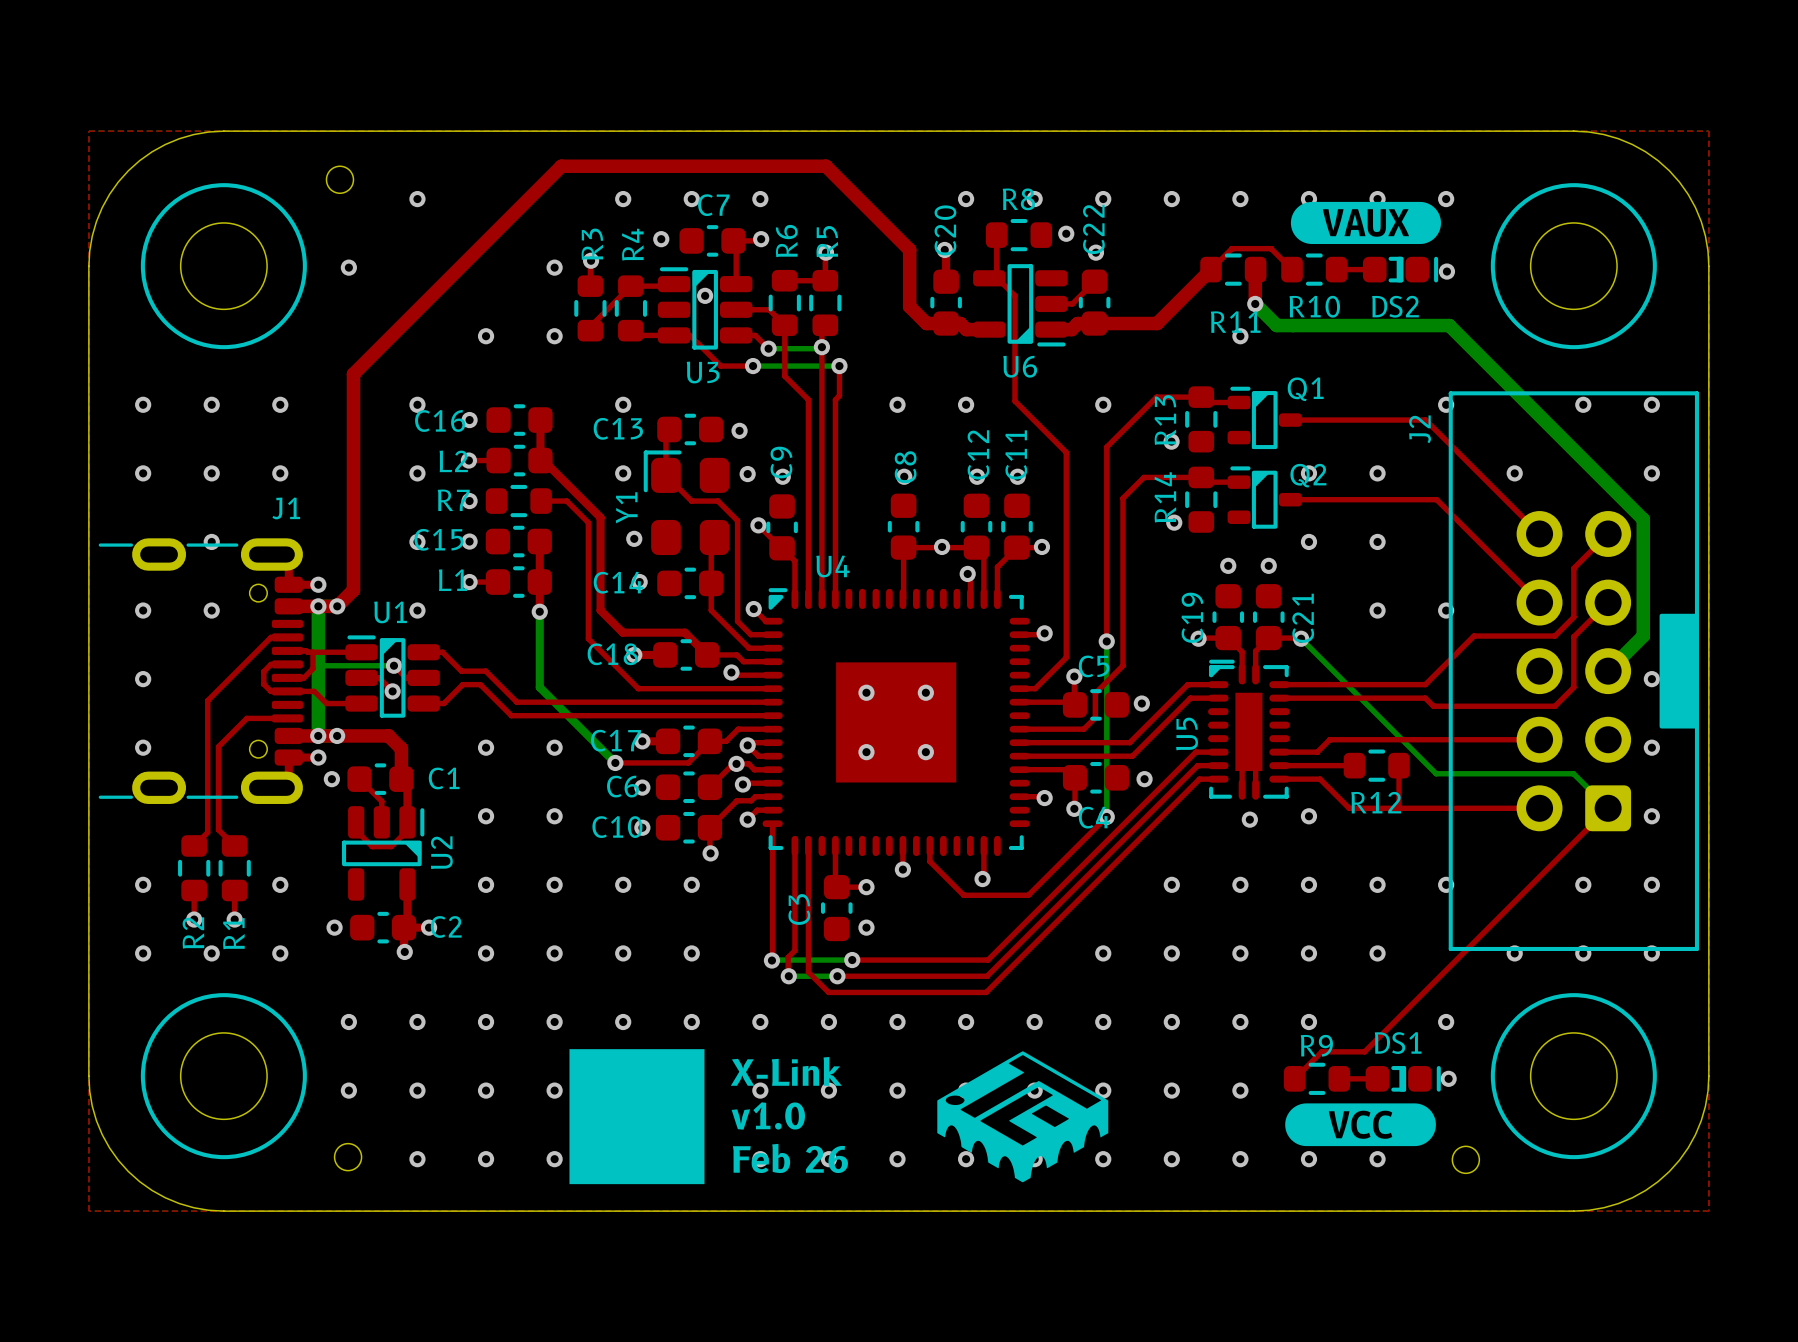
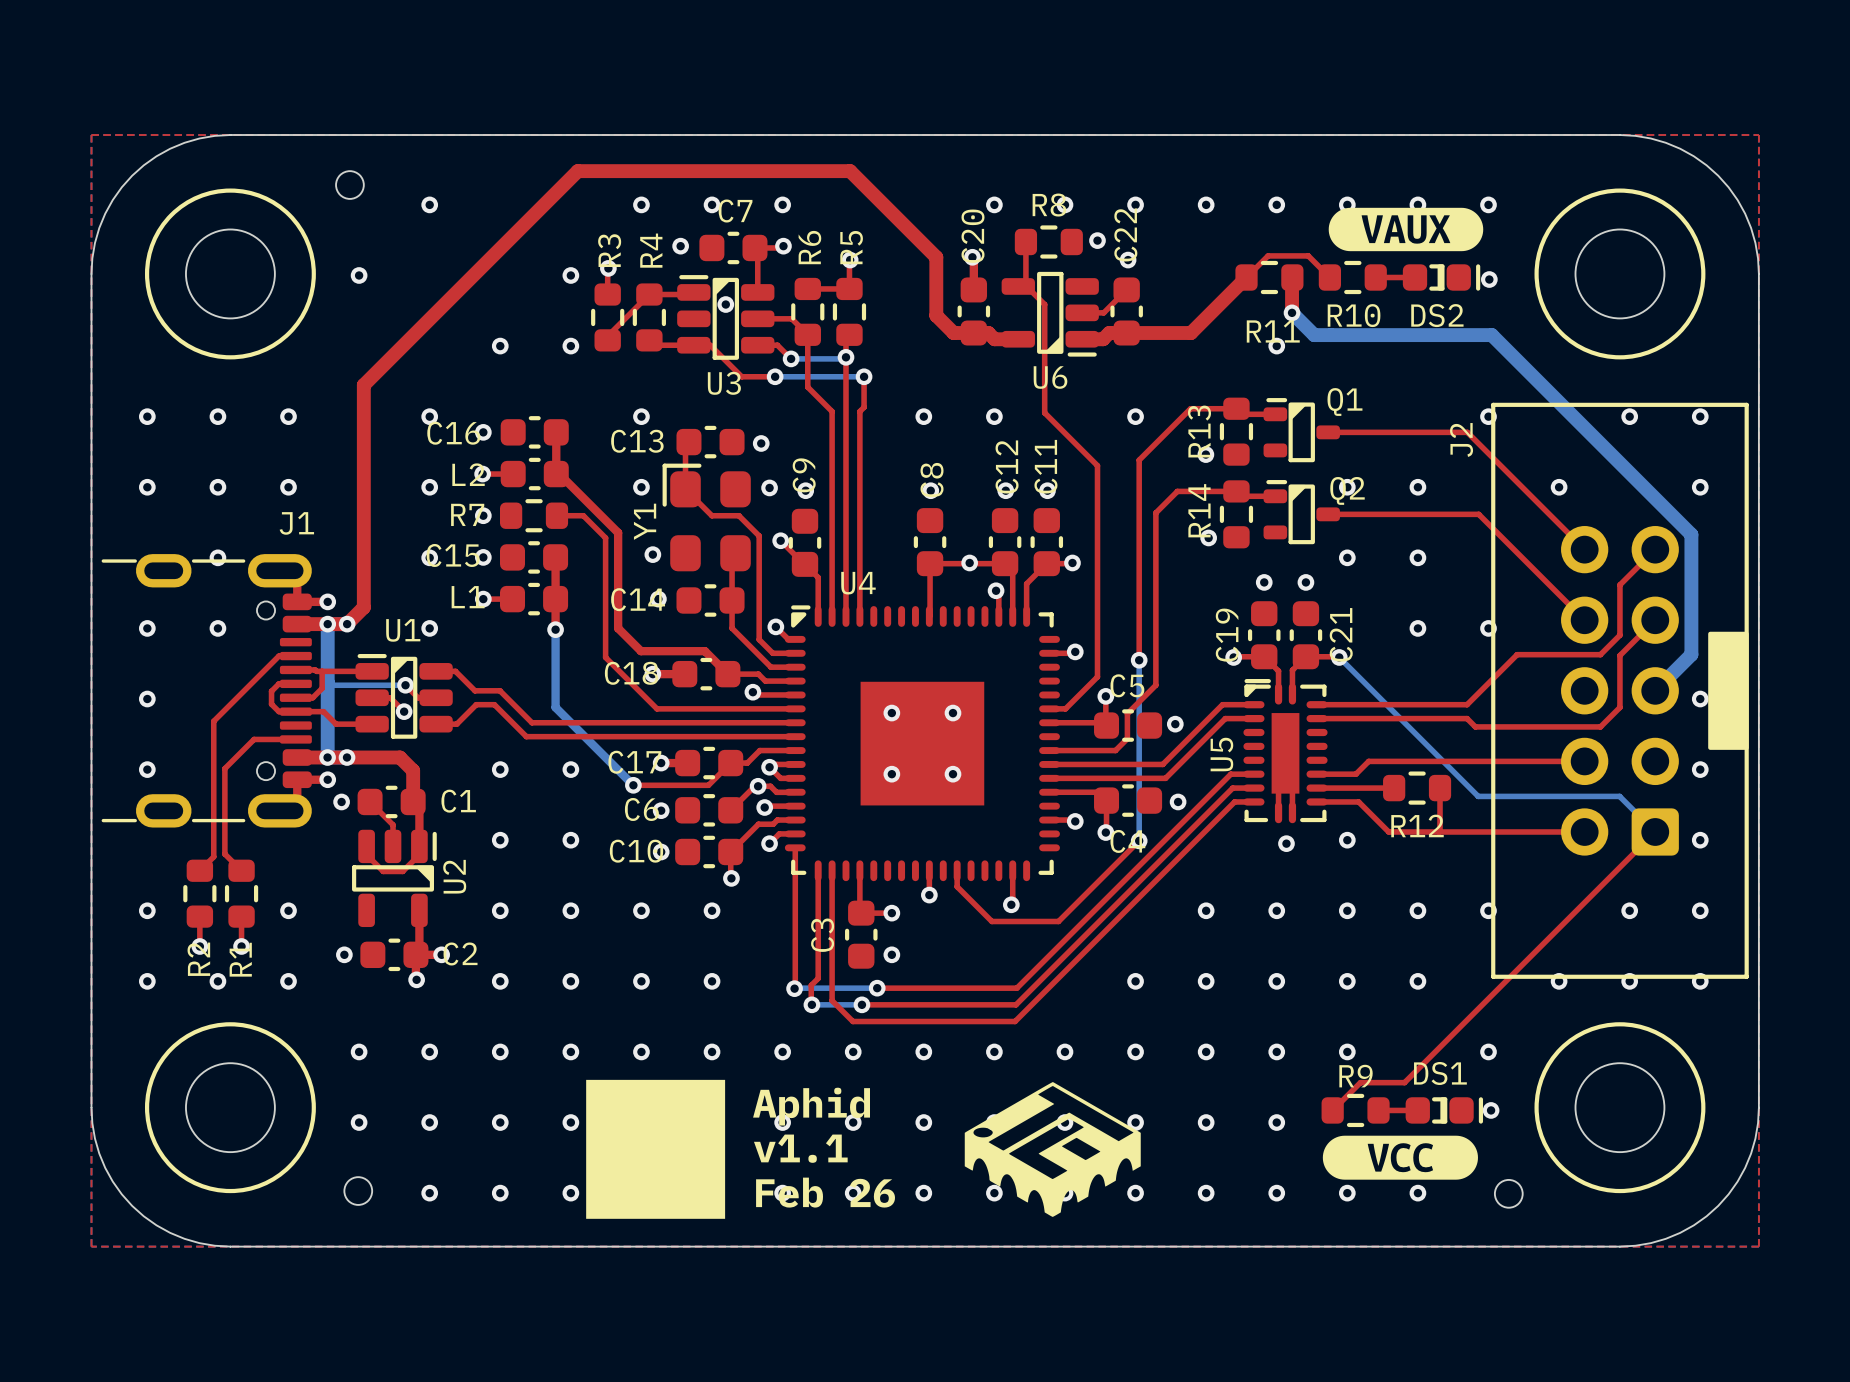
text: X-Link (786, 1071) -> Aphid (811, 1106)
text: v1.0 (768, 1115) -> v1.1 (800, 1148)

